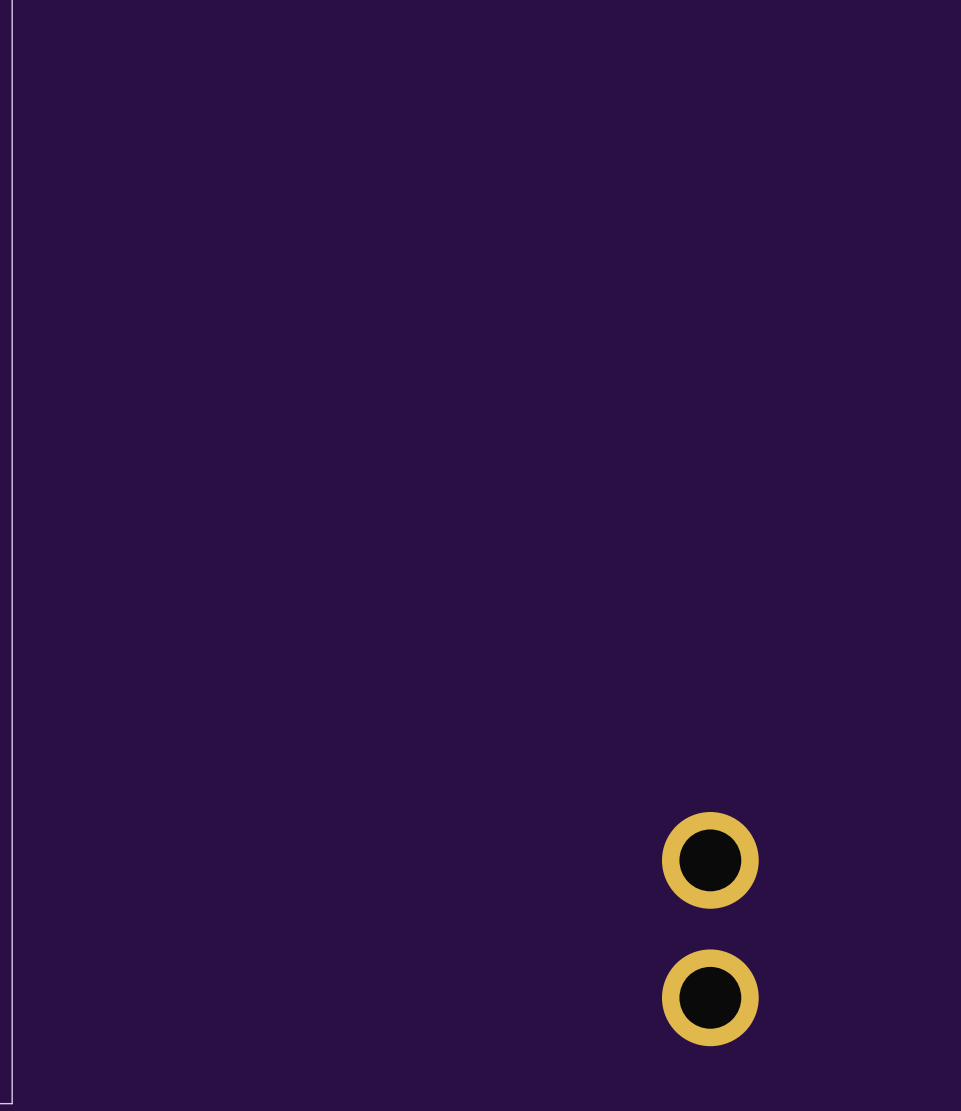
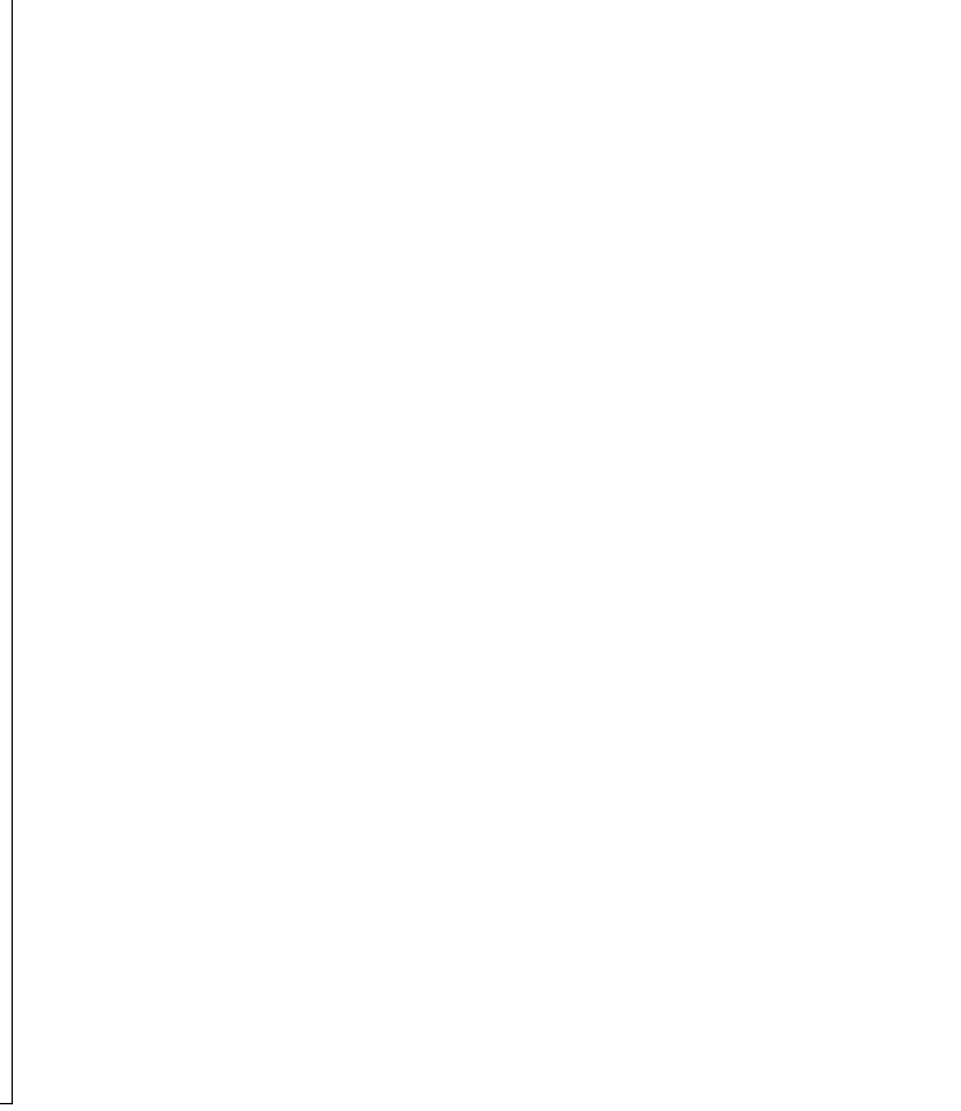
part: (710, 929) -> none

